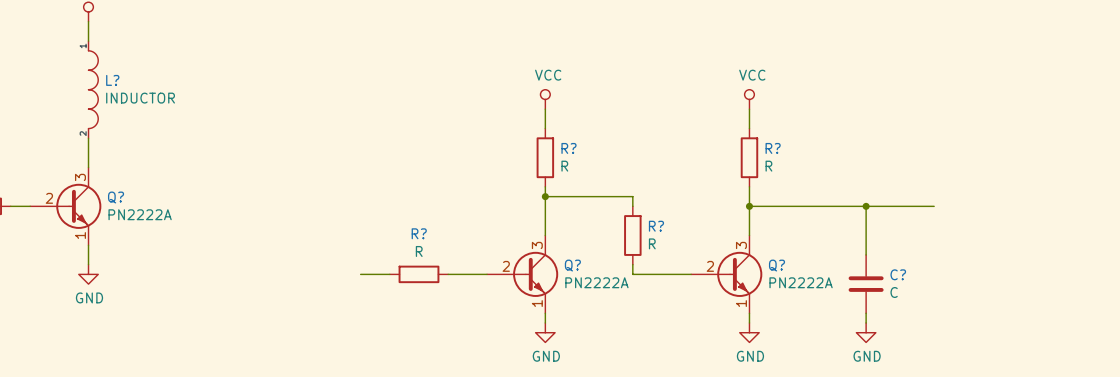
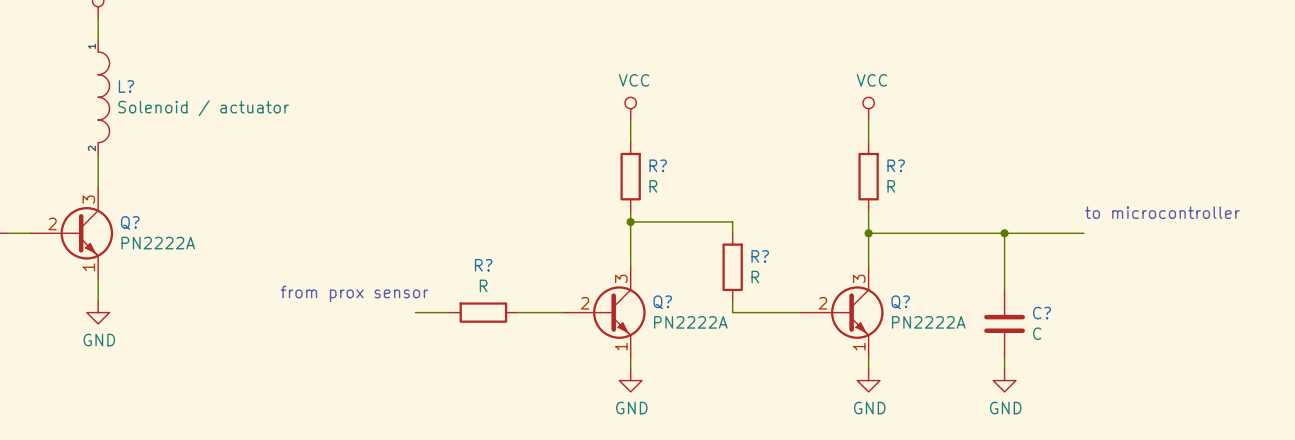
L? value: INDUCTOR (140, 98) -> Solenoid / actuator (203, 108)
text: none -> to microcontroller (1162, 212)
text: none -> from prox sensor (354, 293)

